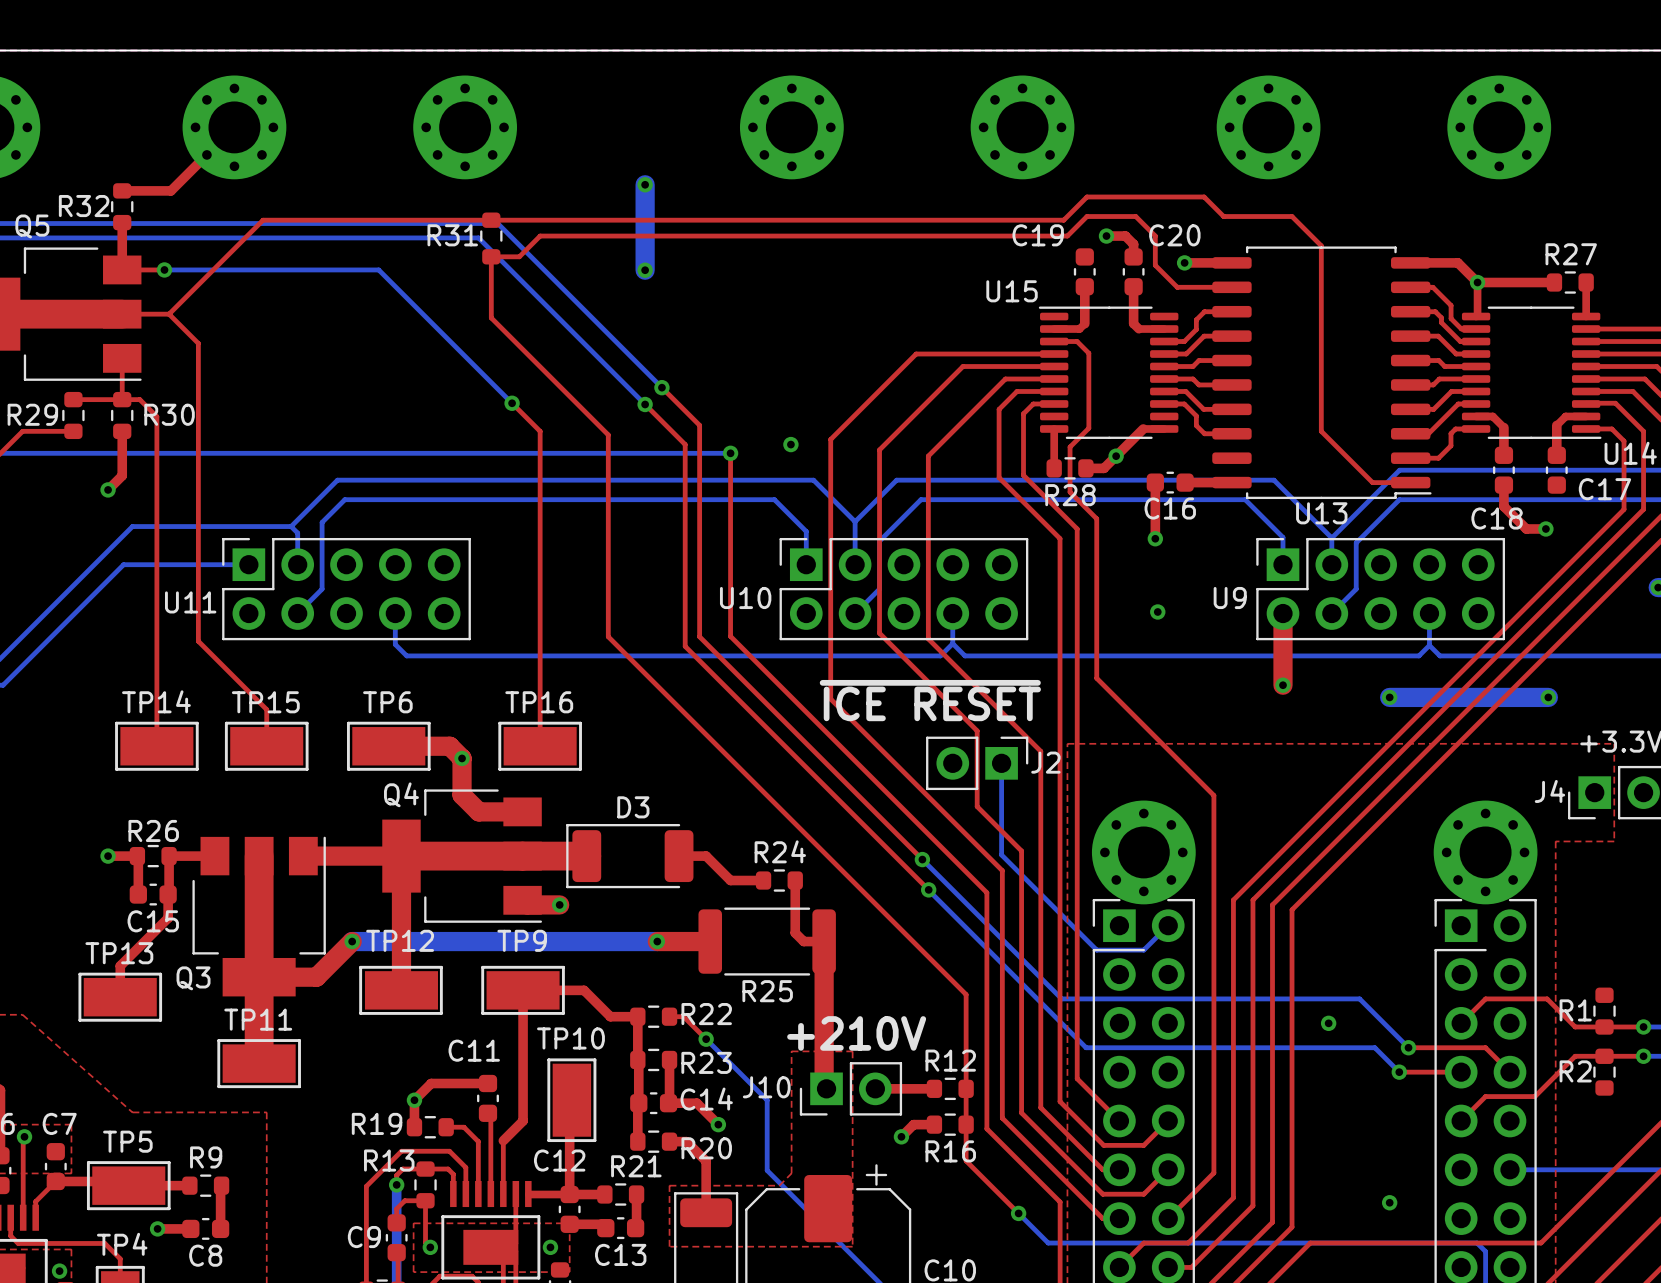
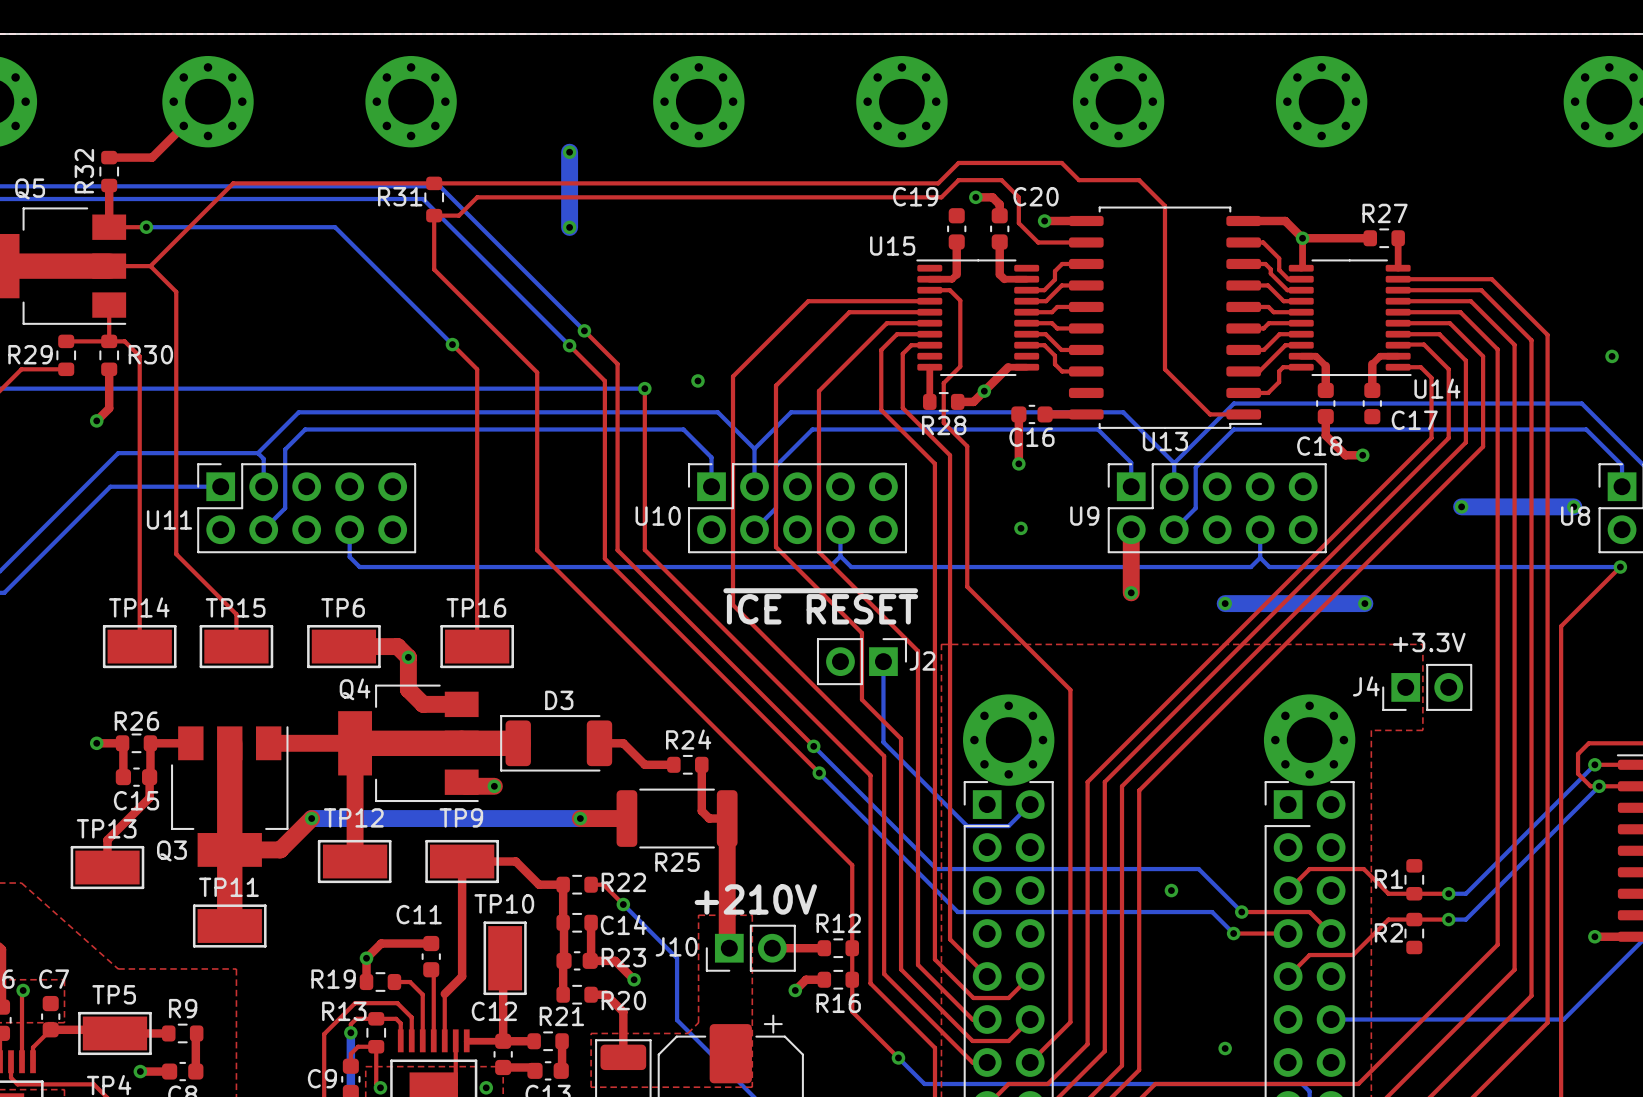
R32 name rotation: 0° (84, 206) -> 90° counterclockwise (84, 171)
R23 name position: R23 (706, 1062) -> R23 (623, 957)
C14 name position: C14 (706, 1099) -> C14 (623, 924)

